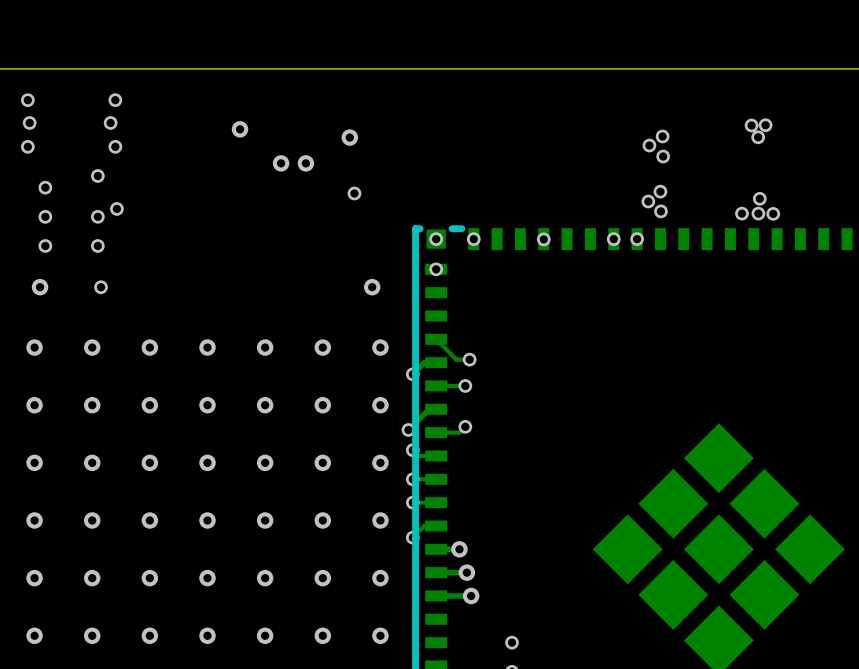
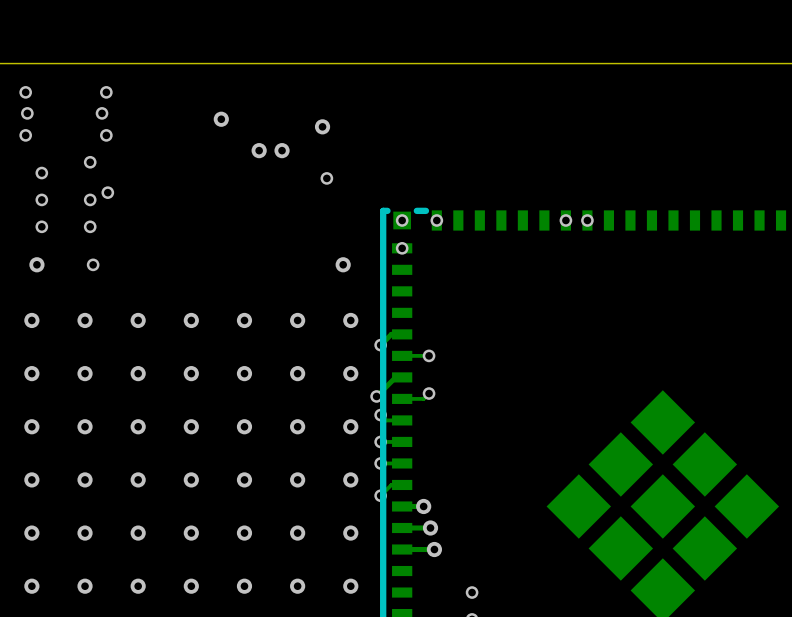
via: (751, 125) -> none
via: (765, 125) -> none
via: (662, 136) -> none
via: (758, 137) -> none
via: (649, 145) -> none
via: (663, 156) -> none
via: (660, 191) -> none
via: (759, 198) -> none
via: (648, 201) -> none
via: (660, 211) -> none
via: (741, 213) -> none
via: (758, 213) -> none
via: (773, 213) -> none
via: (543, 239) -> none
track: (436, 339) (456, 359) (469, 359) -> none
via: (469, 359) -> none

